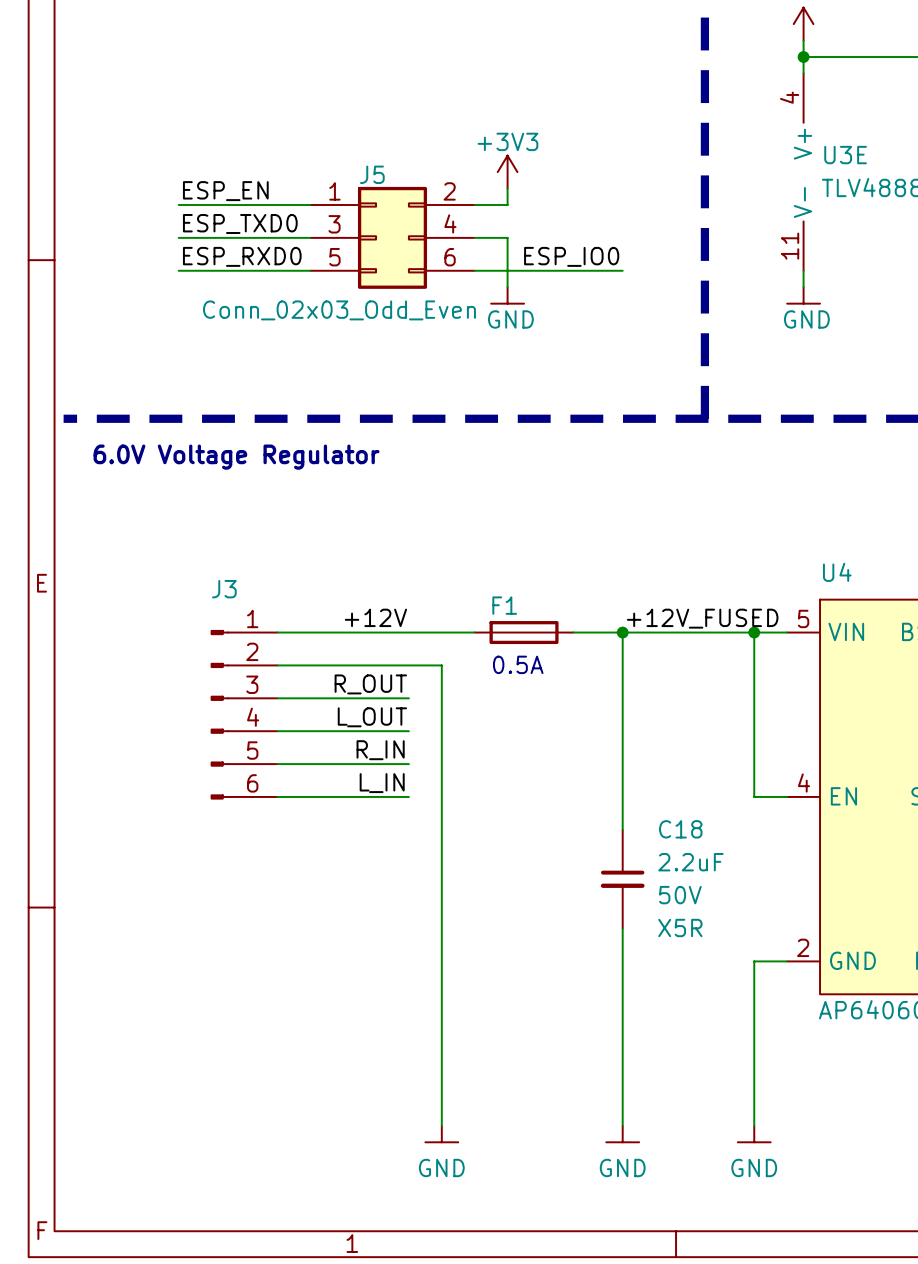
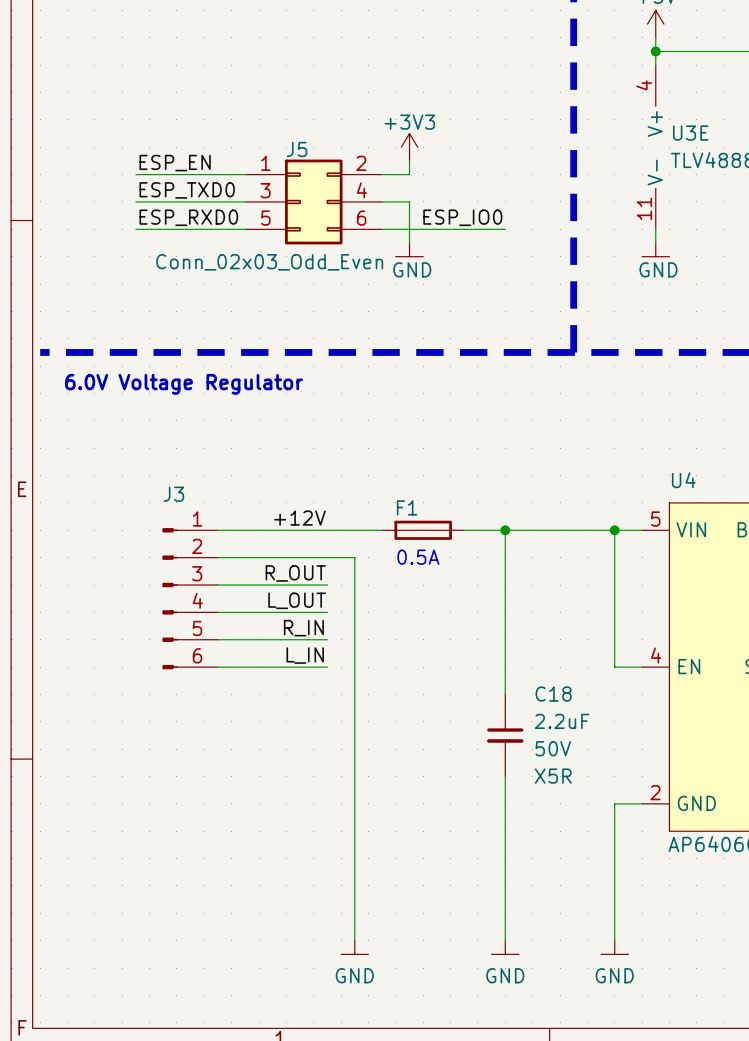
label: +12V_FUSED (702, 618) -> none

